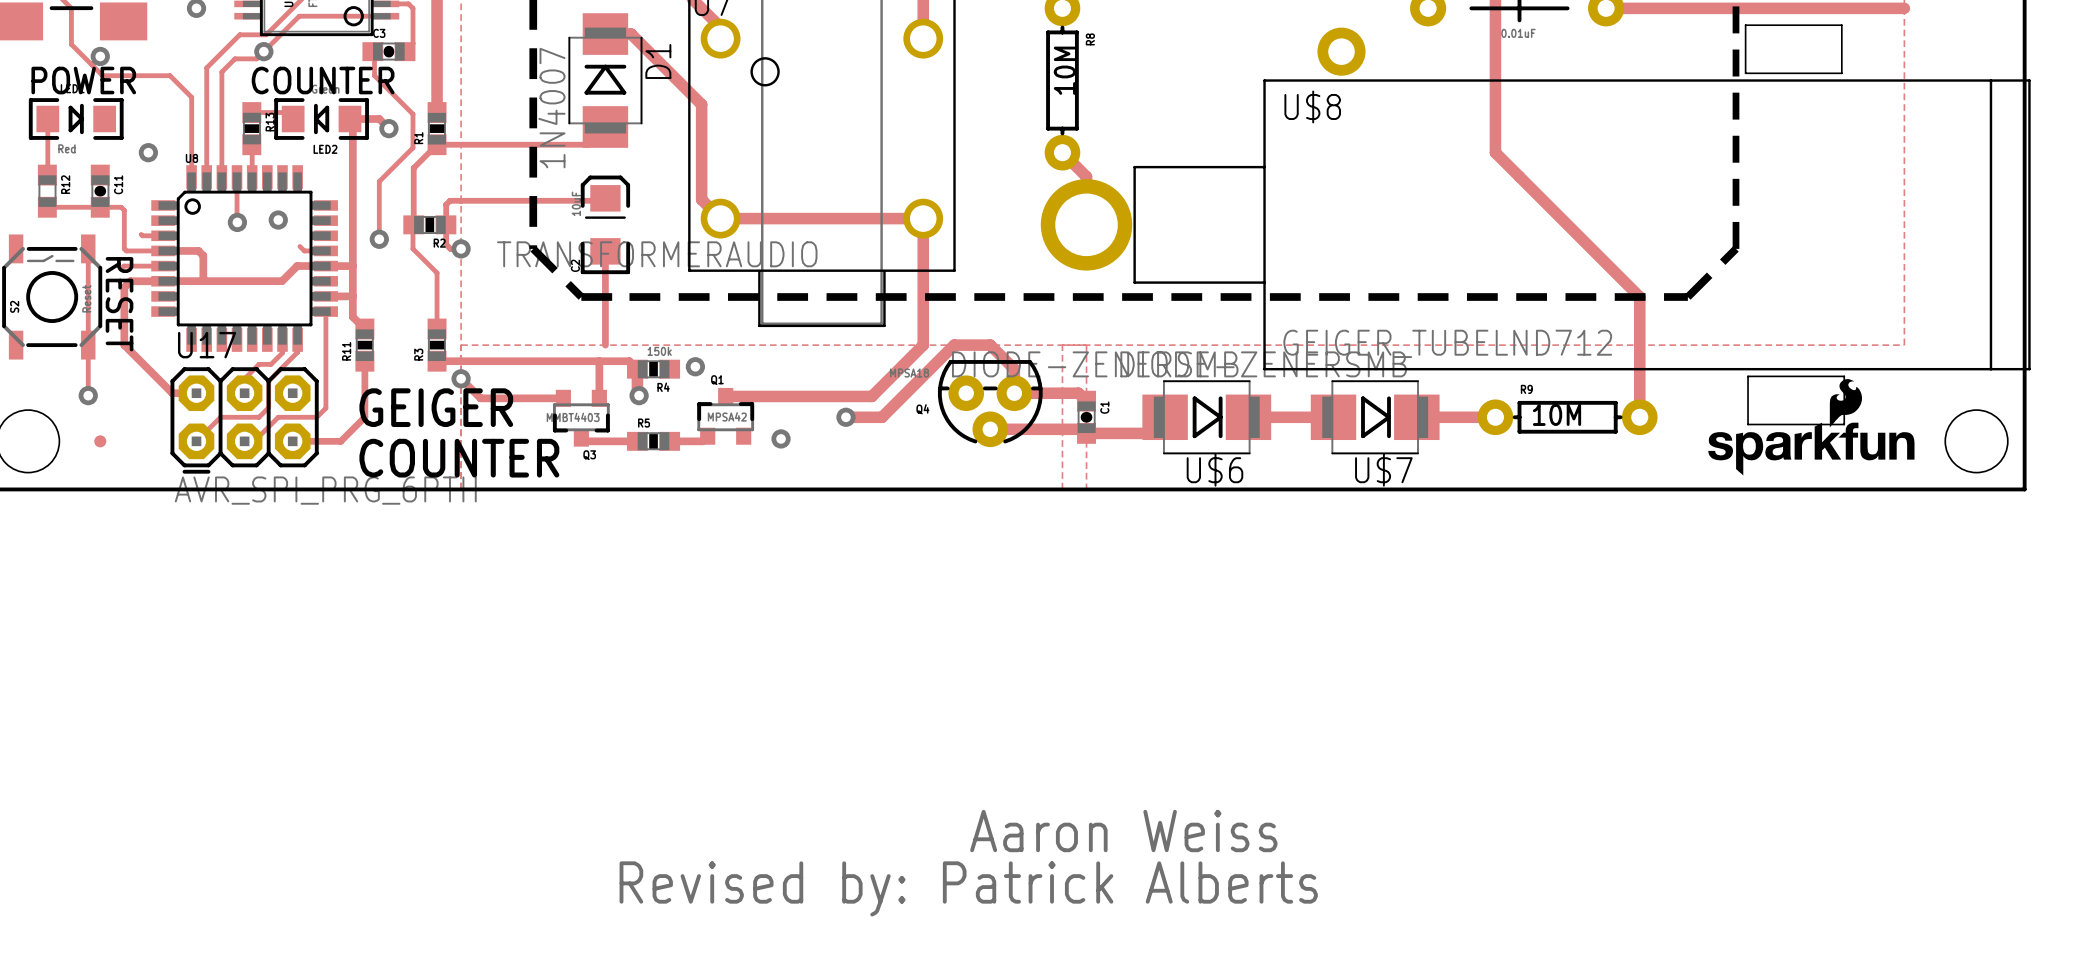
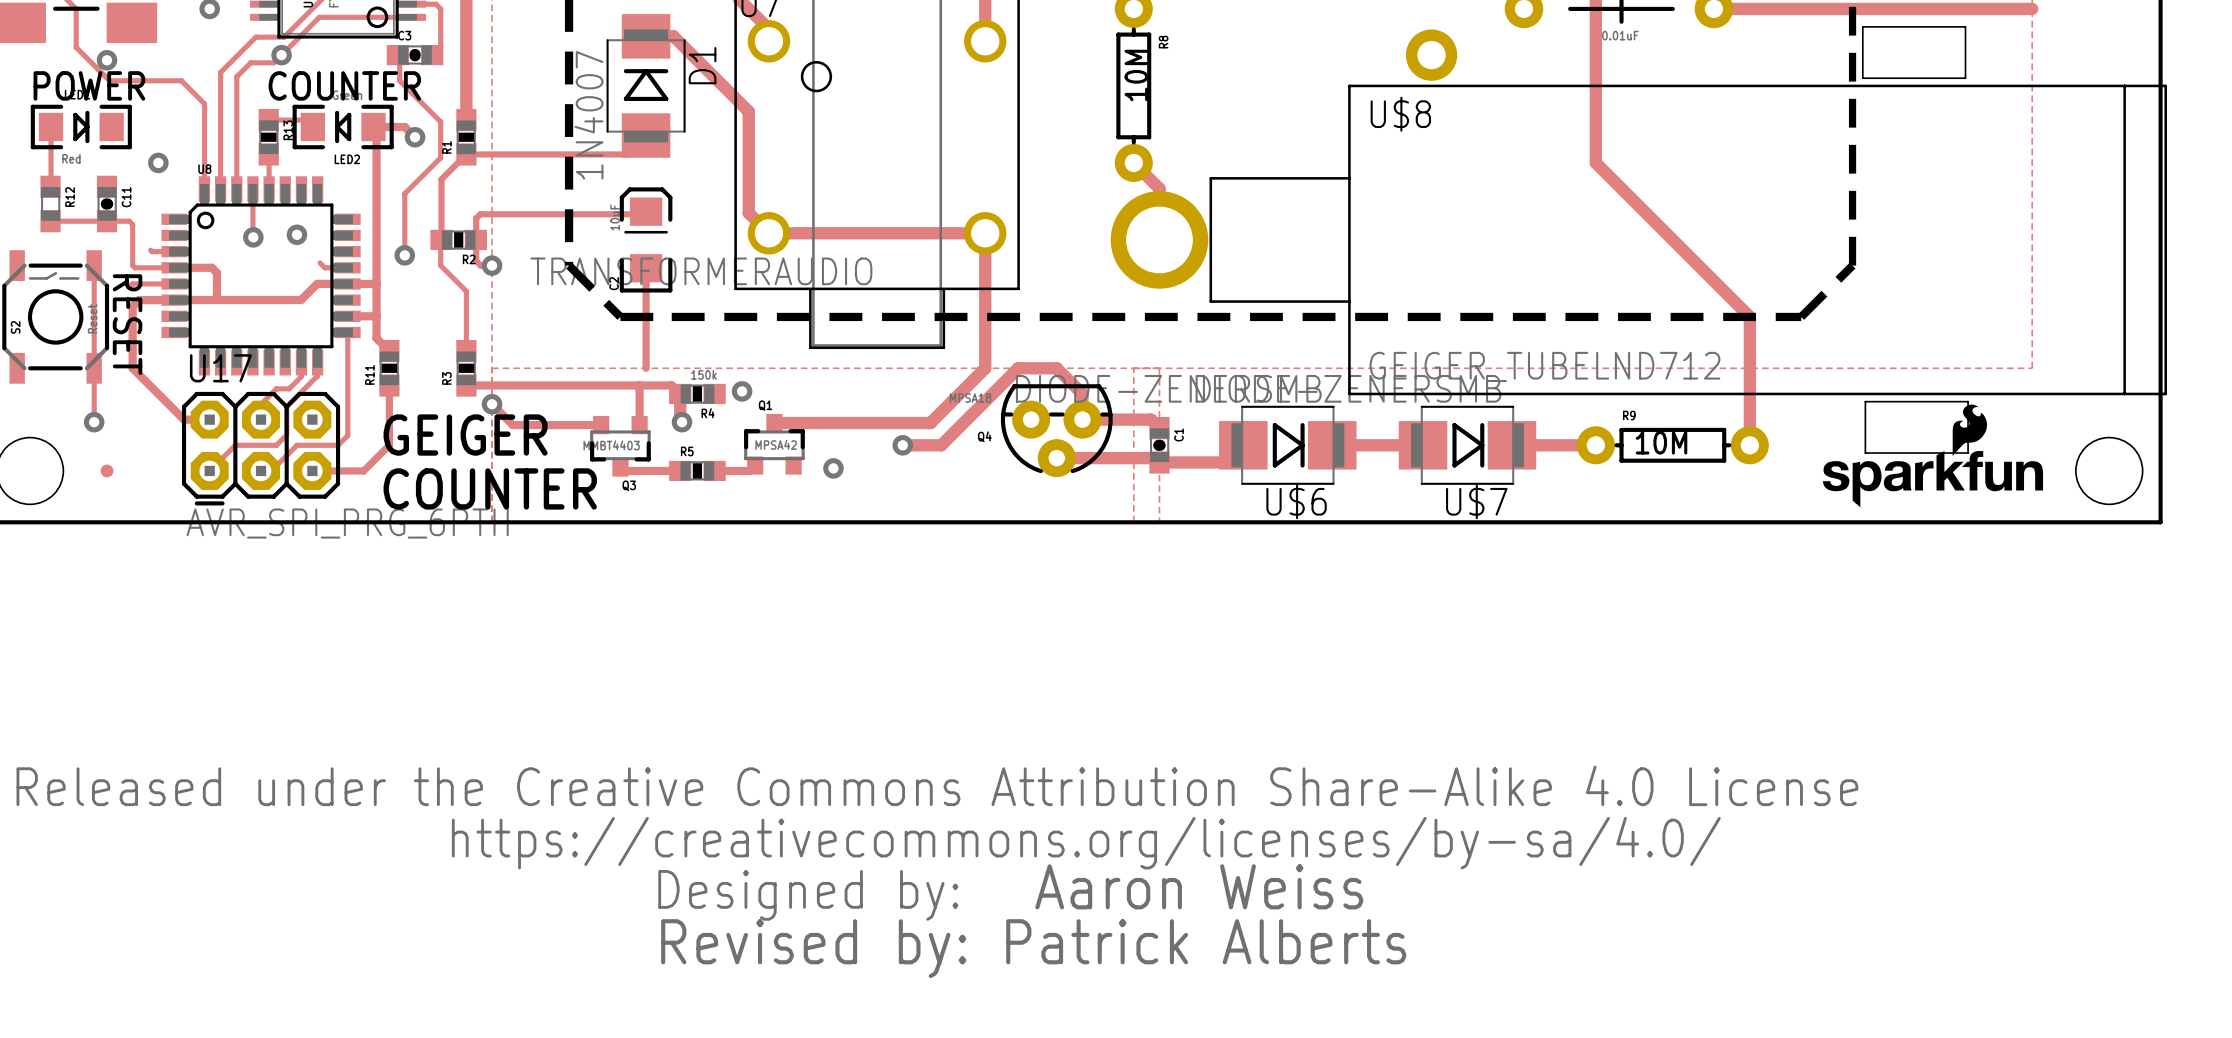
drawing: none -> [16, 765, 1859, 921]

